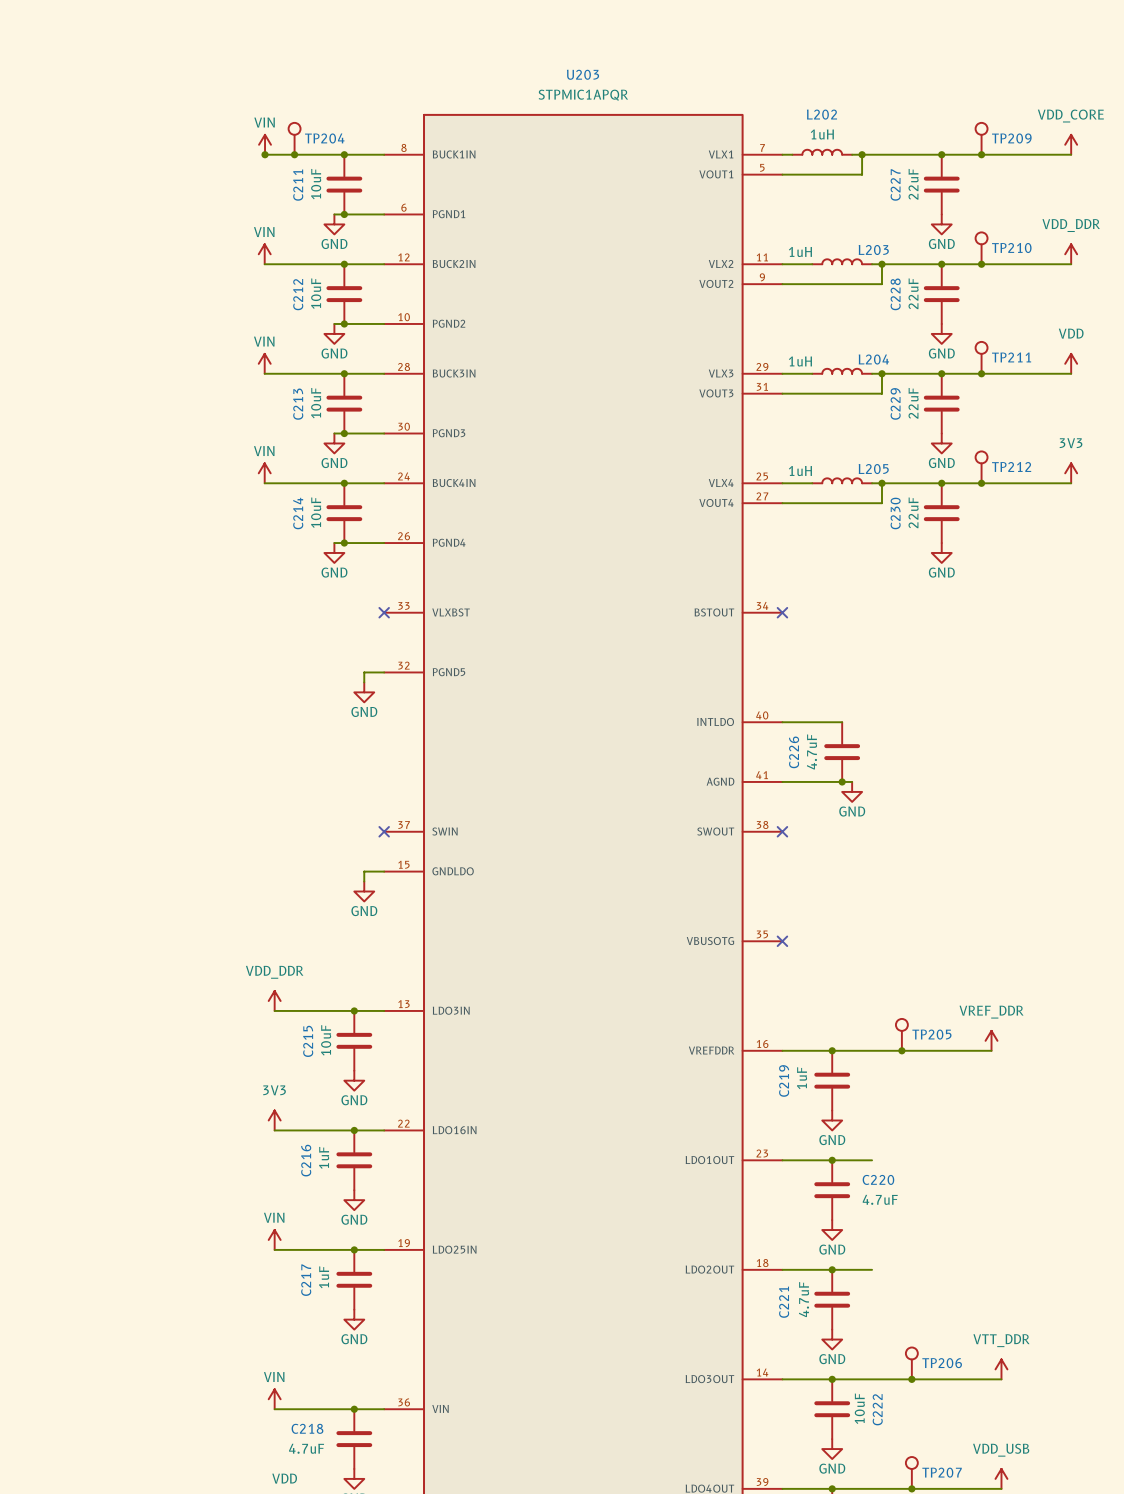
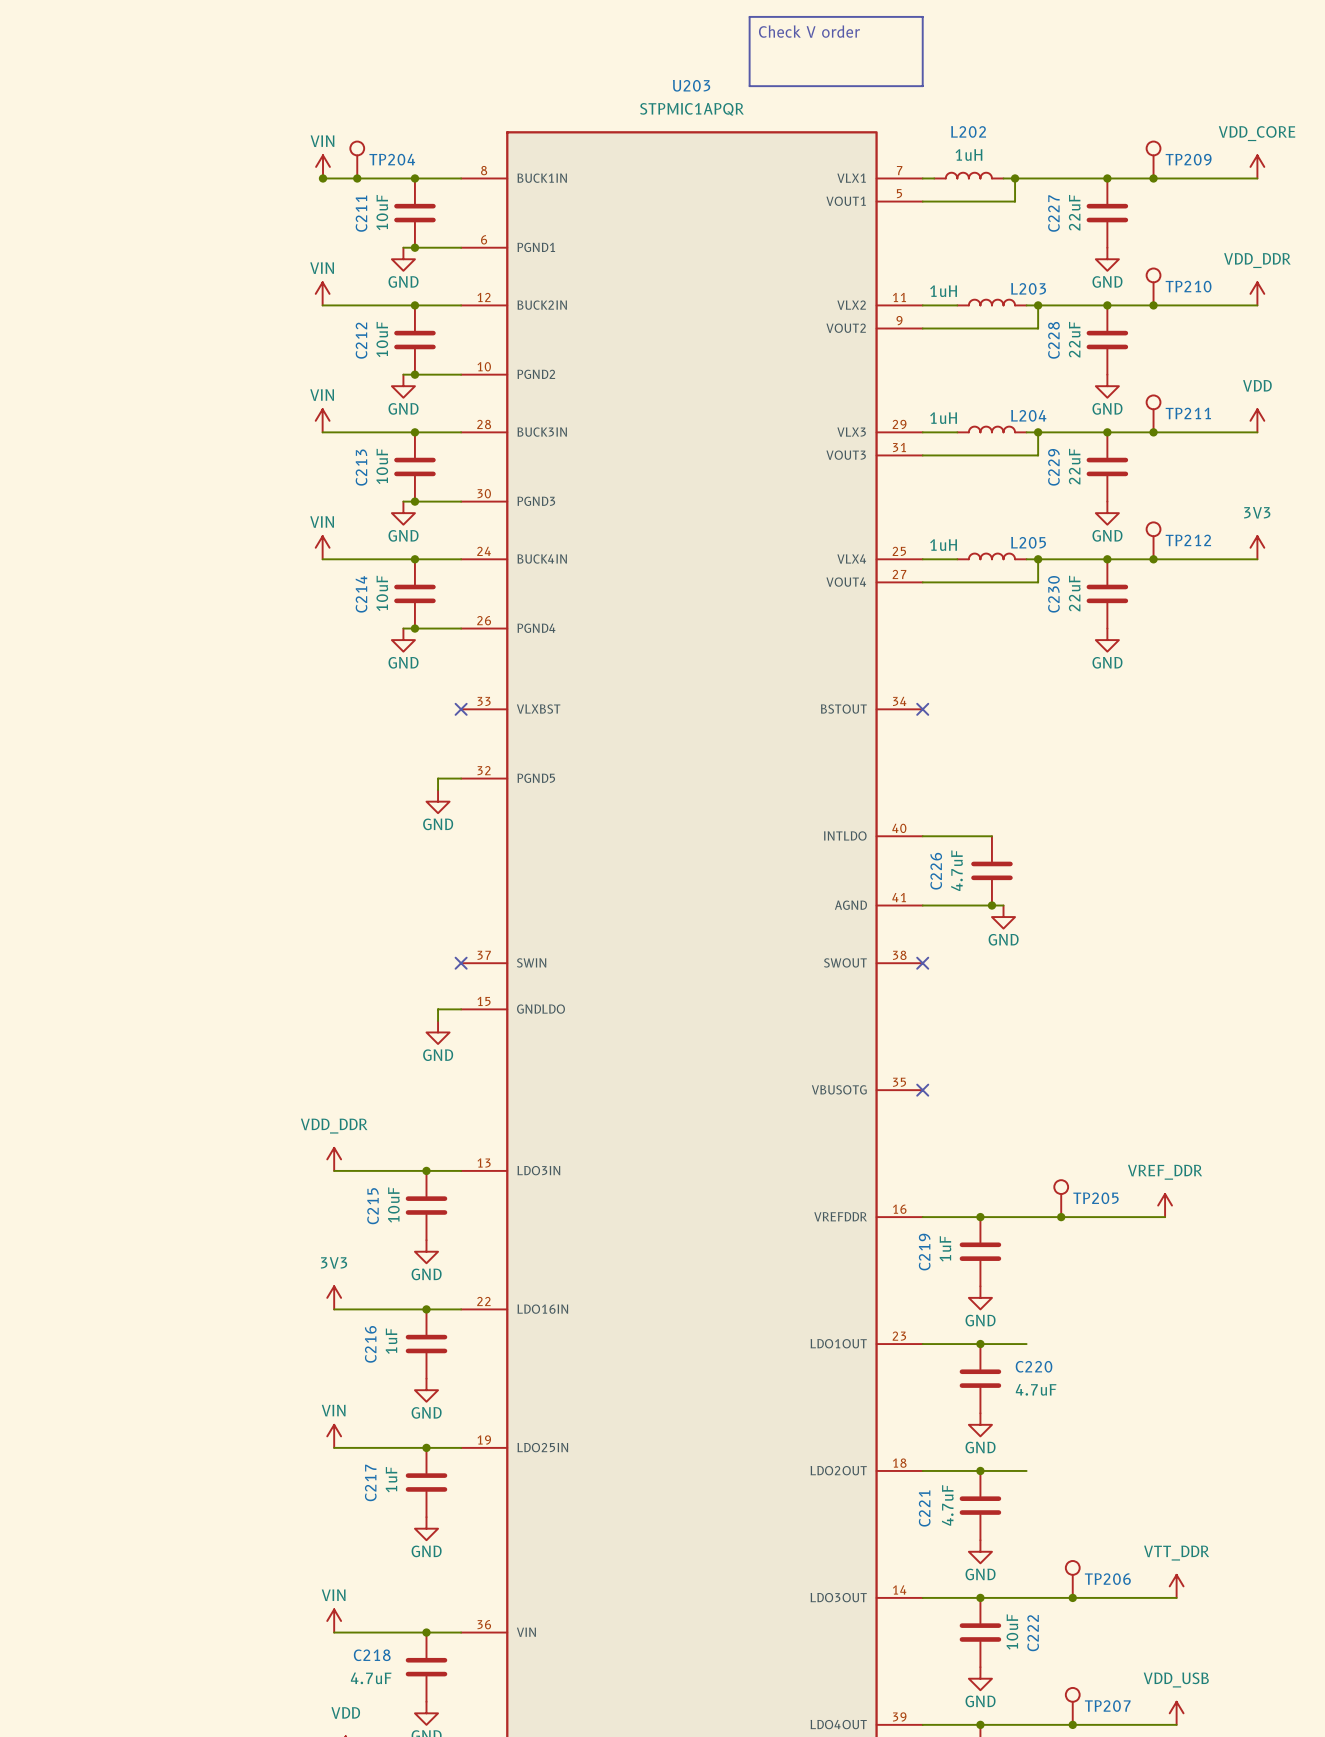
line: none -> (749, 16) (922, 16) (922, 86) (749, 86) (749, 16)
text: none -> Check V order (809, 31)

